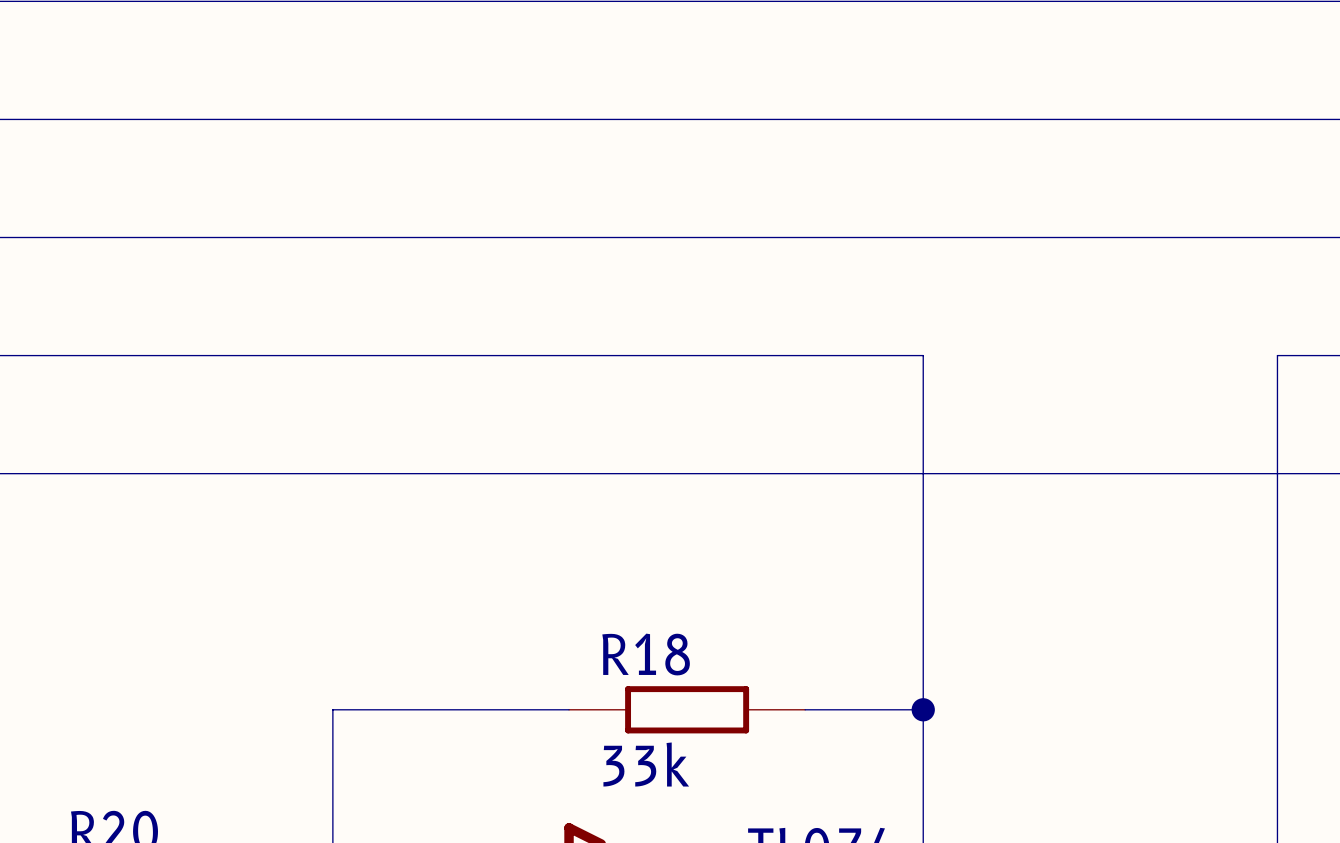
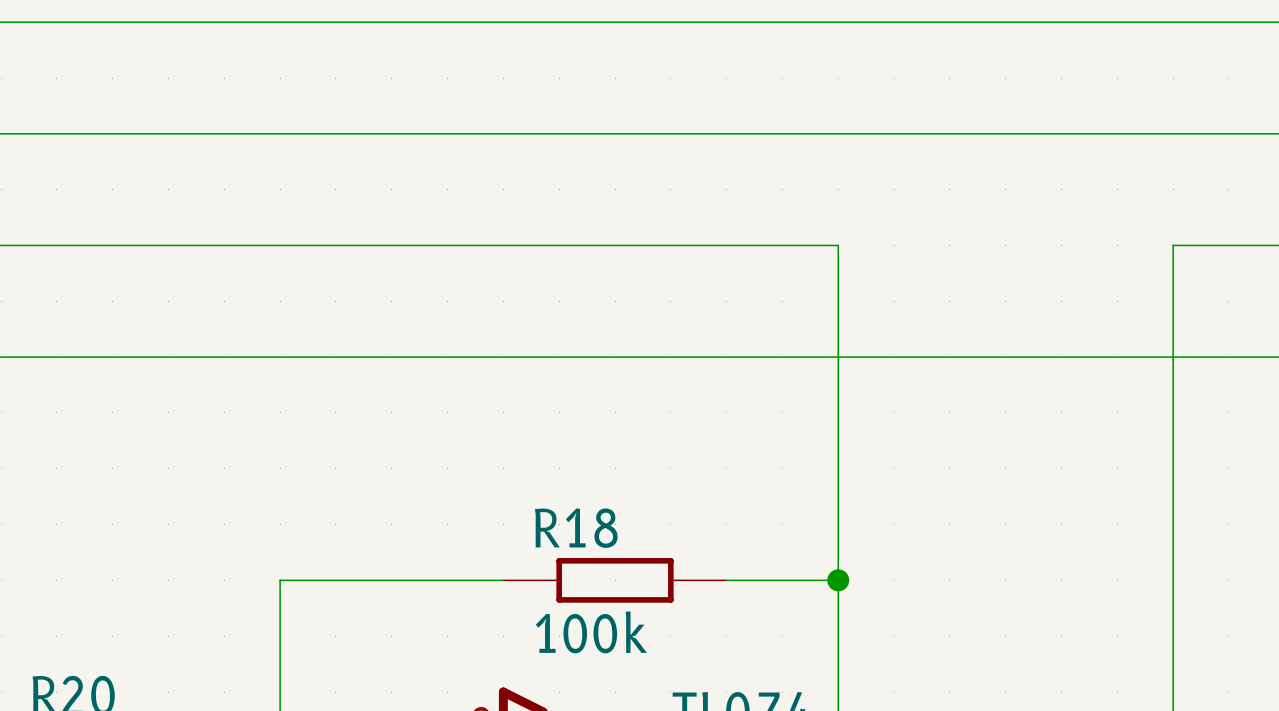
R18 value: 33k (646, 764) -> 100k (591, 632)

